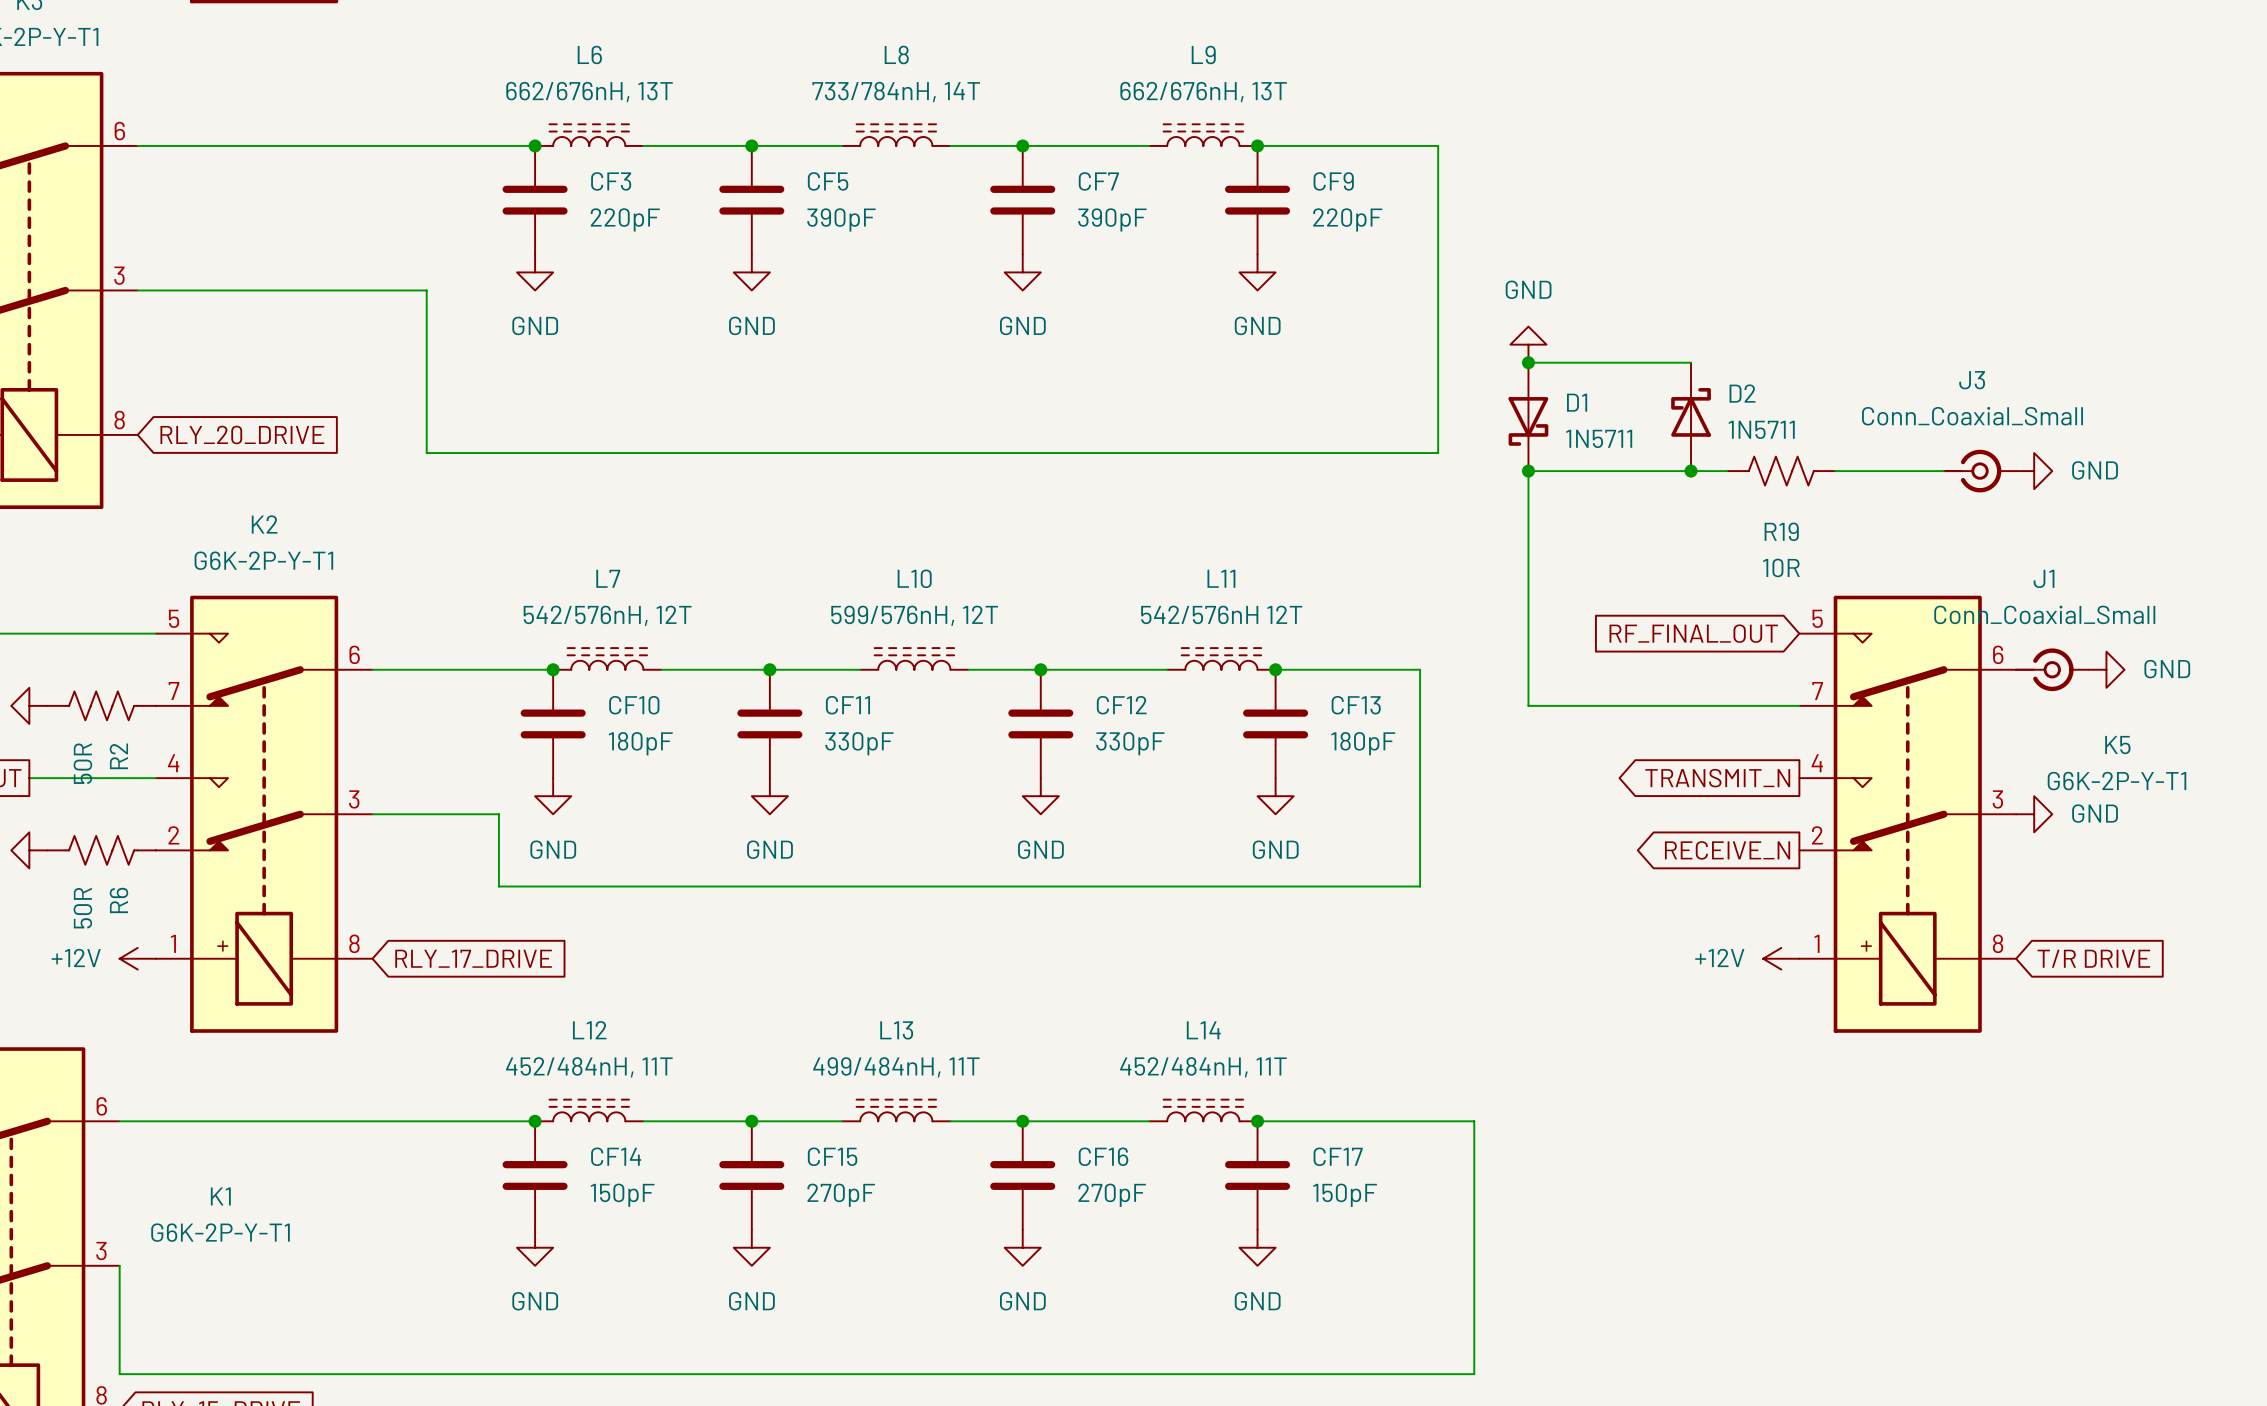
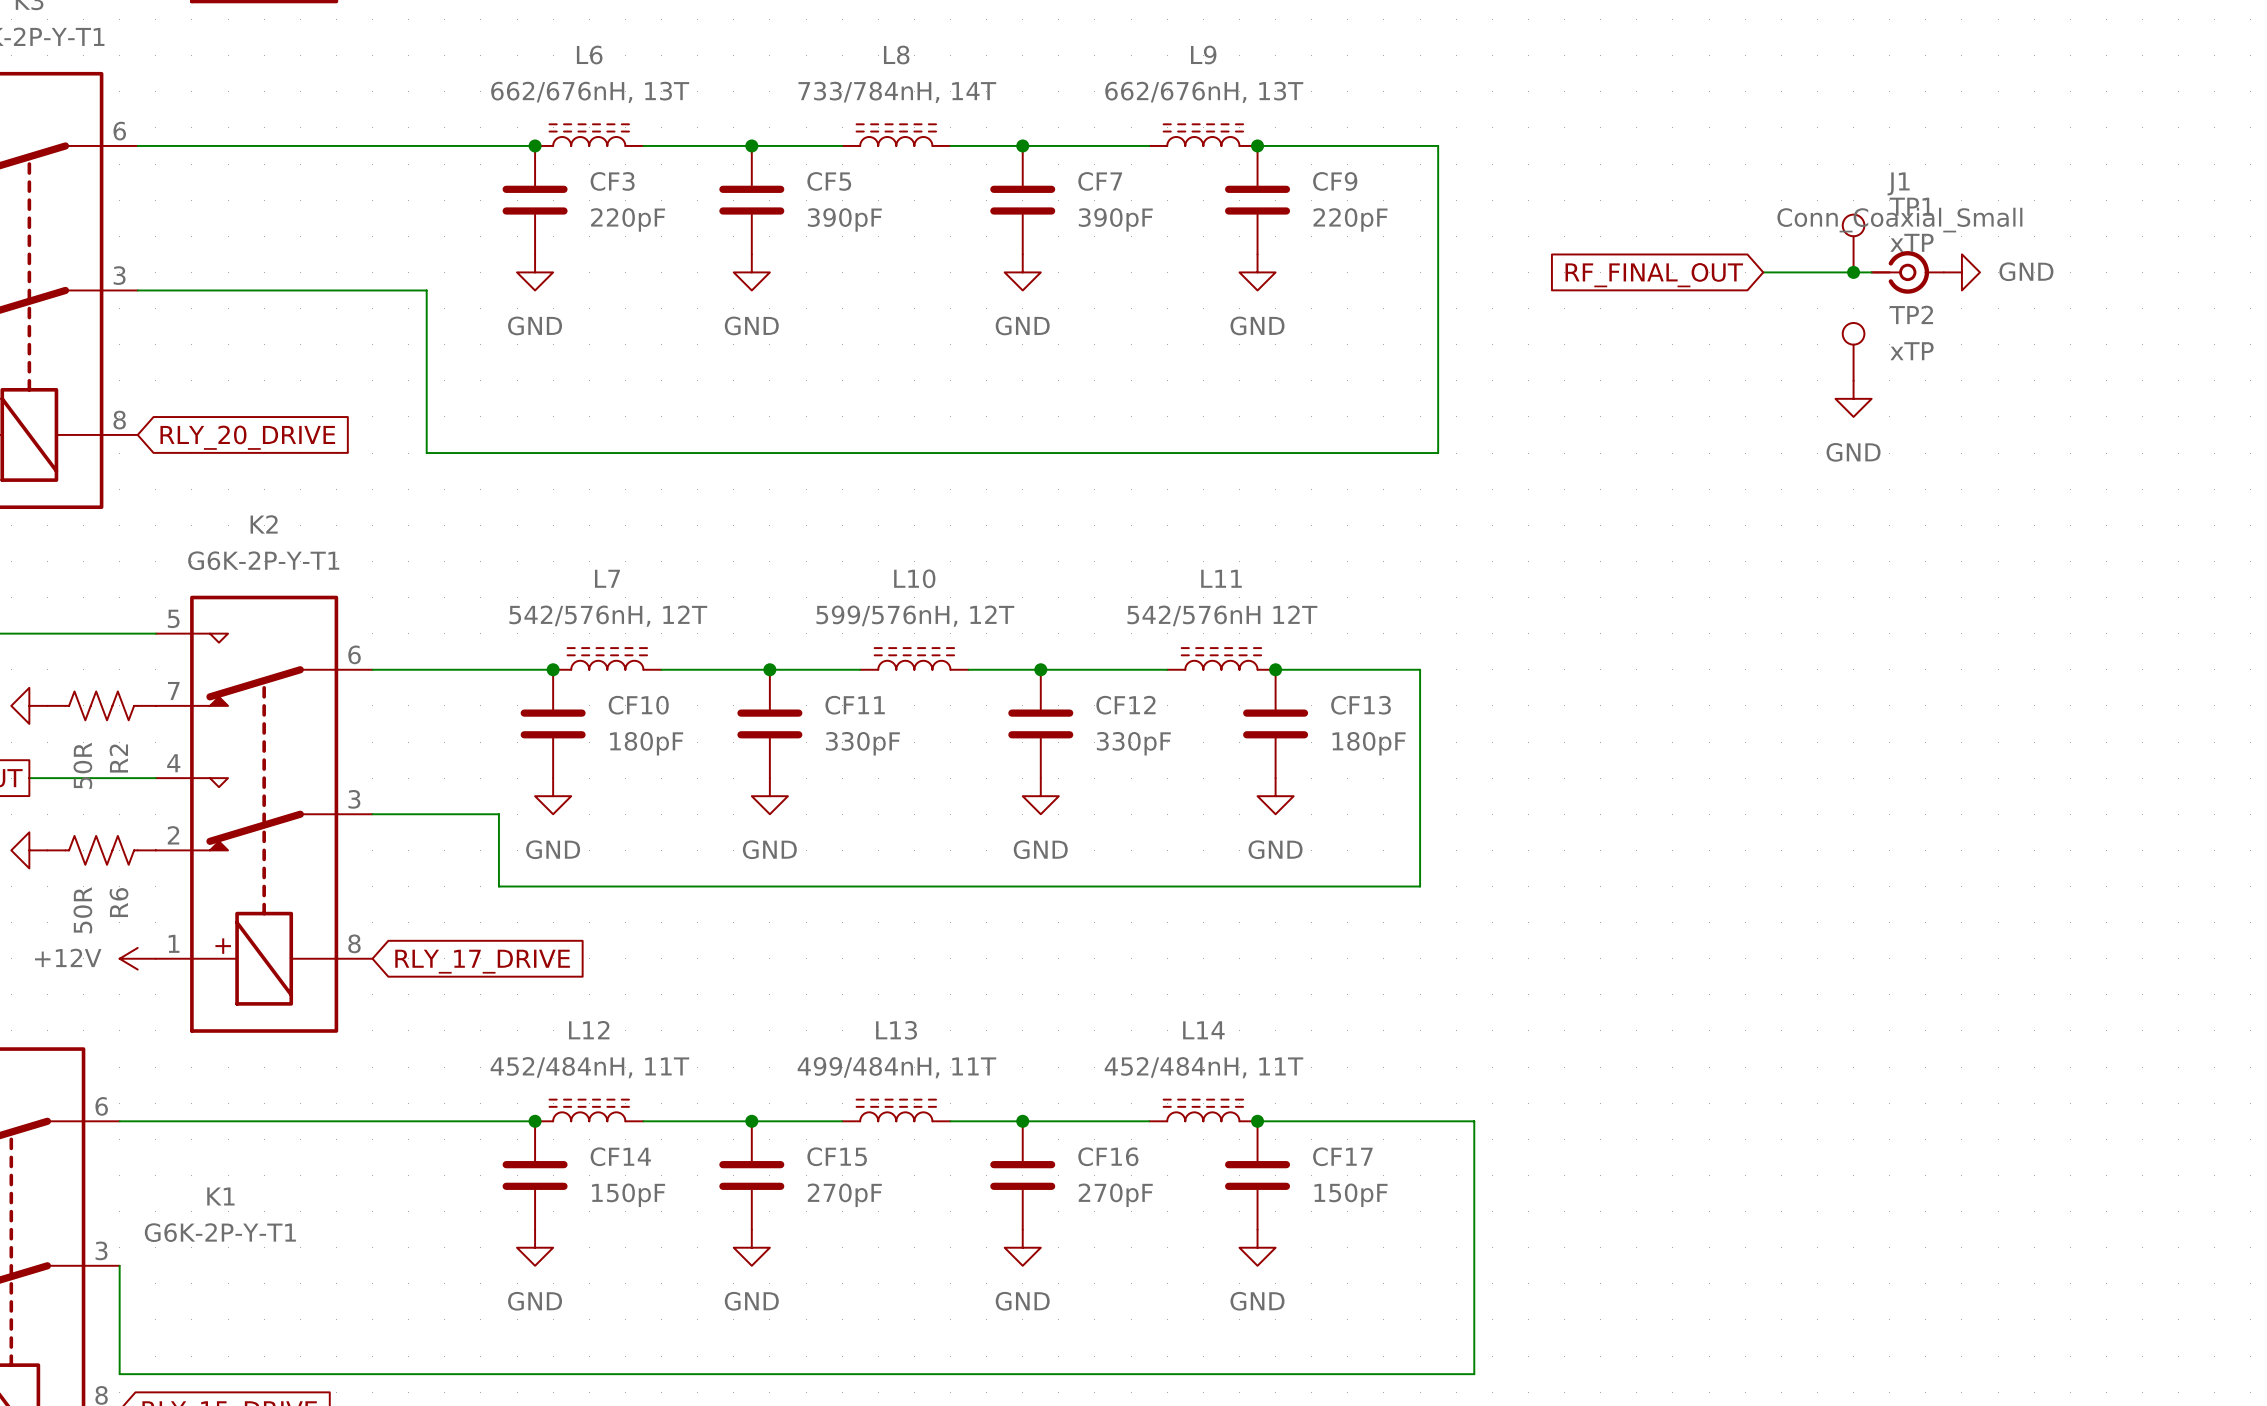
TP1: none -> xTP (1853, 243)
global label: none -> RF_FINAL_OUT (1654, 275)
junction: none -> (1853, 272)
power symbol: none -> GND (1961, 272)
power symbol: GND (1528, 344) -> none
TP2: none -> xTP (1853, 351)
wire: (1528, 362) (1691, 362) -> none
junction: (1528, 362) -> none
power symbol: none -> GND (1853, 398)
D1: 1N5711 (1528, 416) -> none
D2: 1N5711 (1691, 416) -> none
junction: (1528, 471) -> none
junction: (1691, 471) -> none
wire: (1727, 471) (1528, 471) (1528, 705) (1799, 705) -> none
R19: 10R (1781, 471) -> none
wire: (1835, 471) (1943, 471) -> (1763, 272) (1871, 272)
J3: Conn_Coaxial_Small (1980, 471) -> none
power symbol: GND (2034, 471) -> none
global label: RF_FINAL_OUT (1693, 633) -> none
J1 position: (2052, 669) -> (1907, 272)
power symbol: GND (2106, 669) -> none
global label: TRANSMIT_N (1717, 778) -> none
K5: G6K-2P-Y-T1 (1907, 814) -> none
power symbol: GND (2034, 814) -> none
global label: RECEIVE_N (1727, 850) -> none
power symbol: +12V (1781, 958) -> none
global label: T/R DRIVE (2093, 958) -> none

